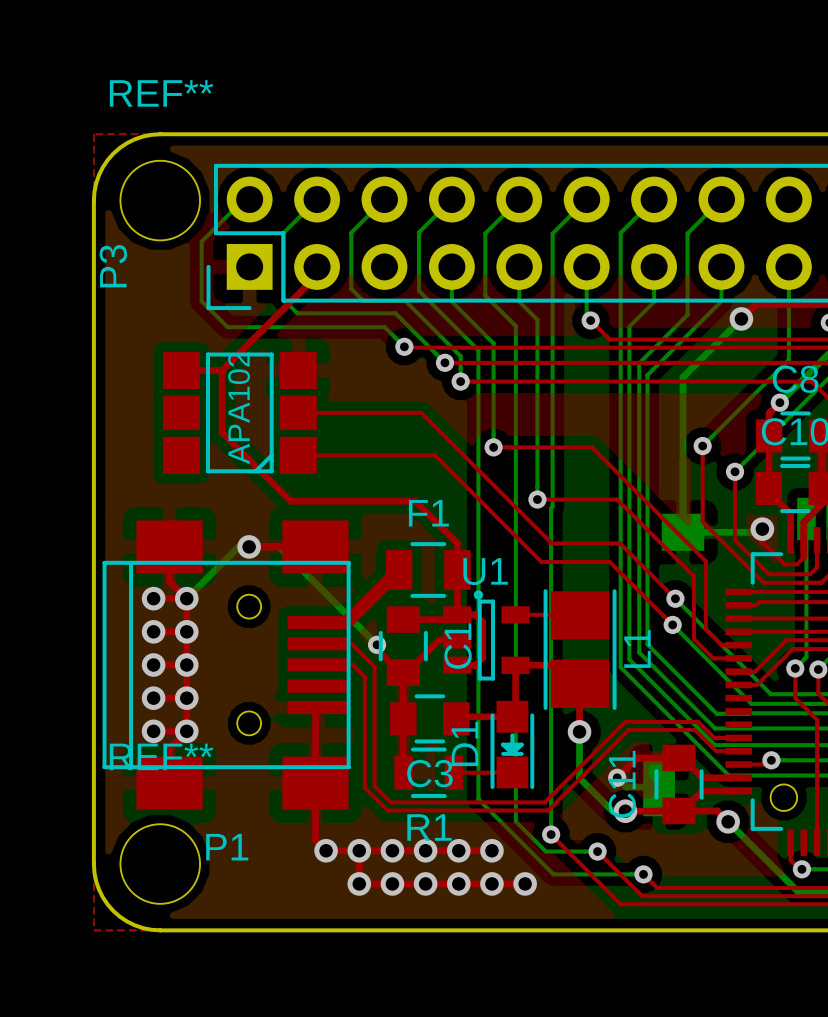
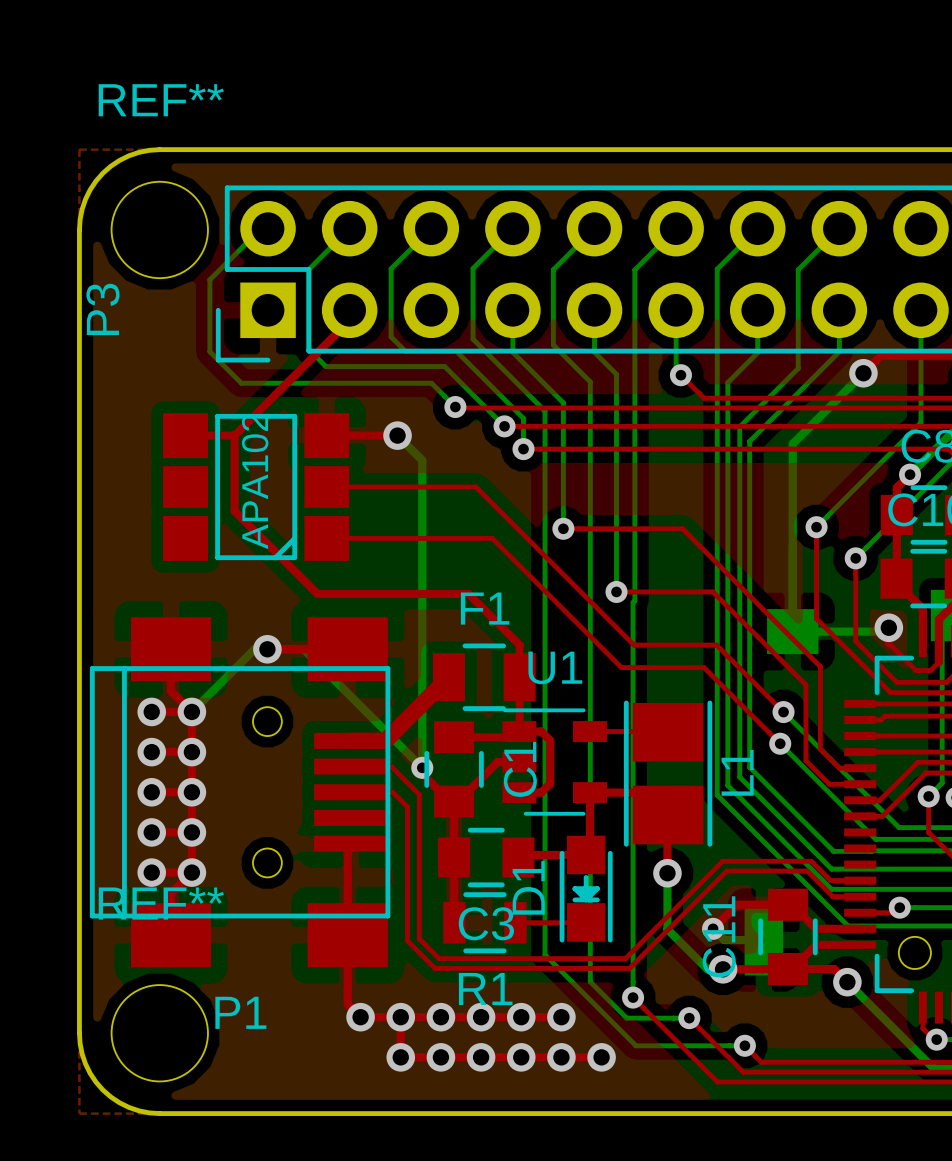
top track: none -> (326, 435) (397, 435)
bottom track: none -> (397, 435) (422, 460) (422, 767)
via: none -> (397, 435)
U1 footprint: [443, 590, 530, 681] -> [502, 708, 608, 816]

